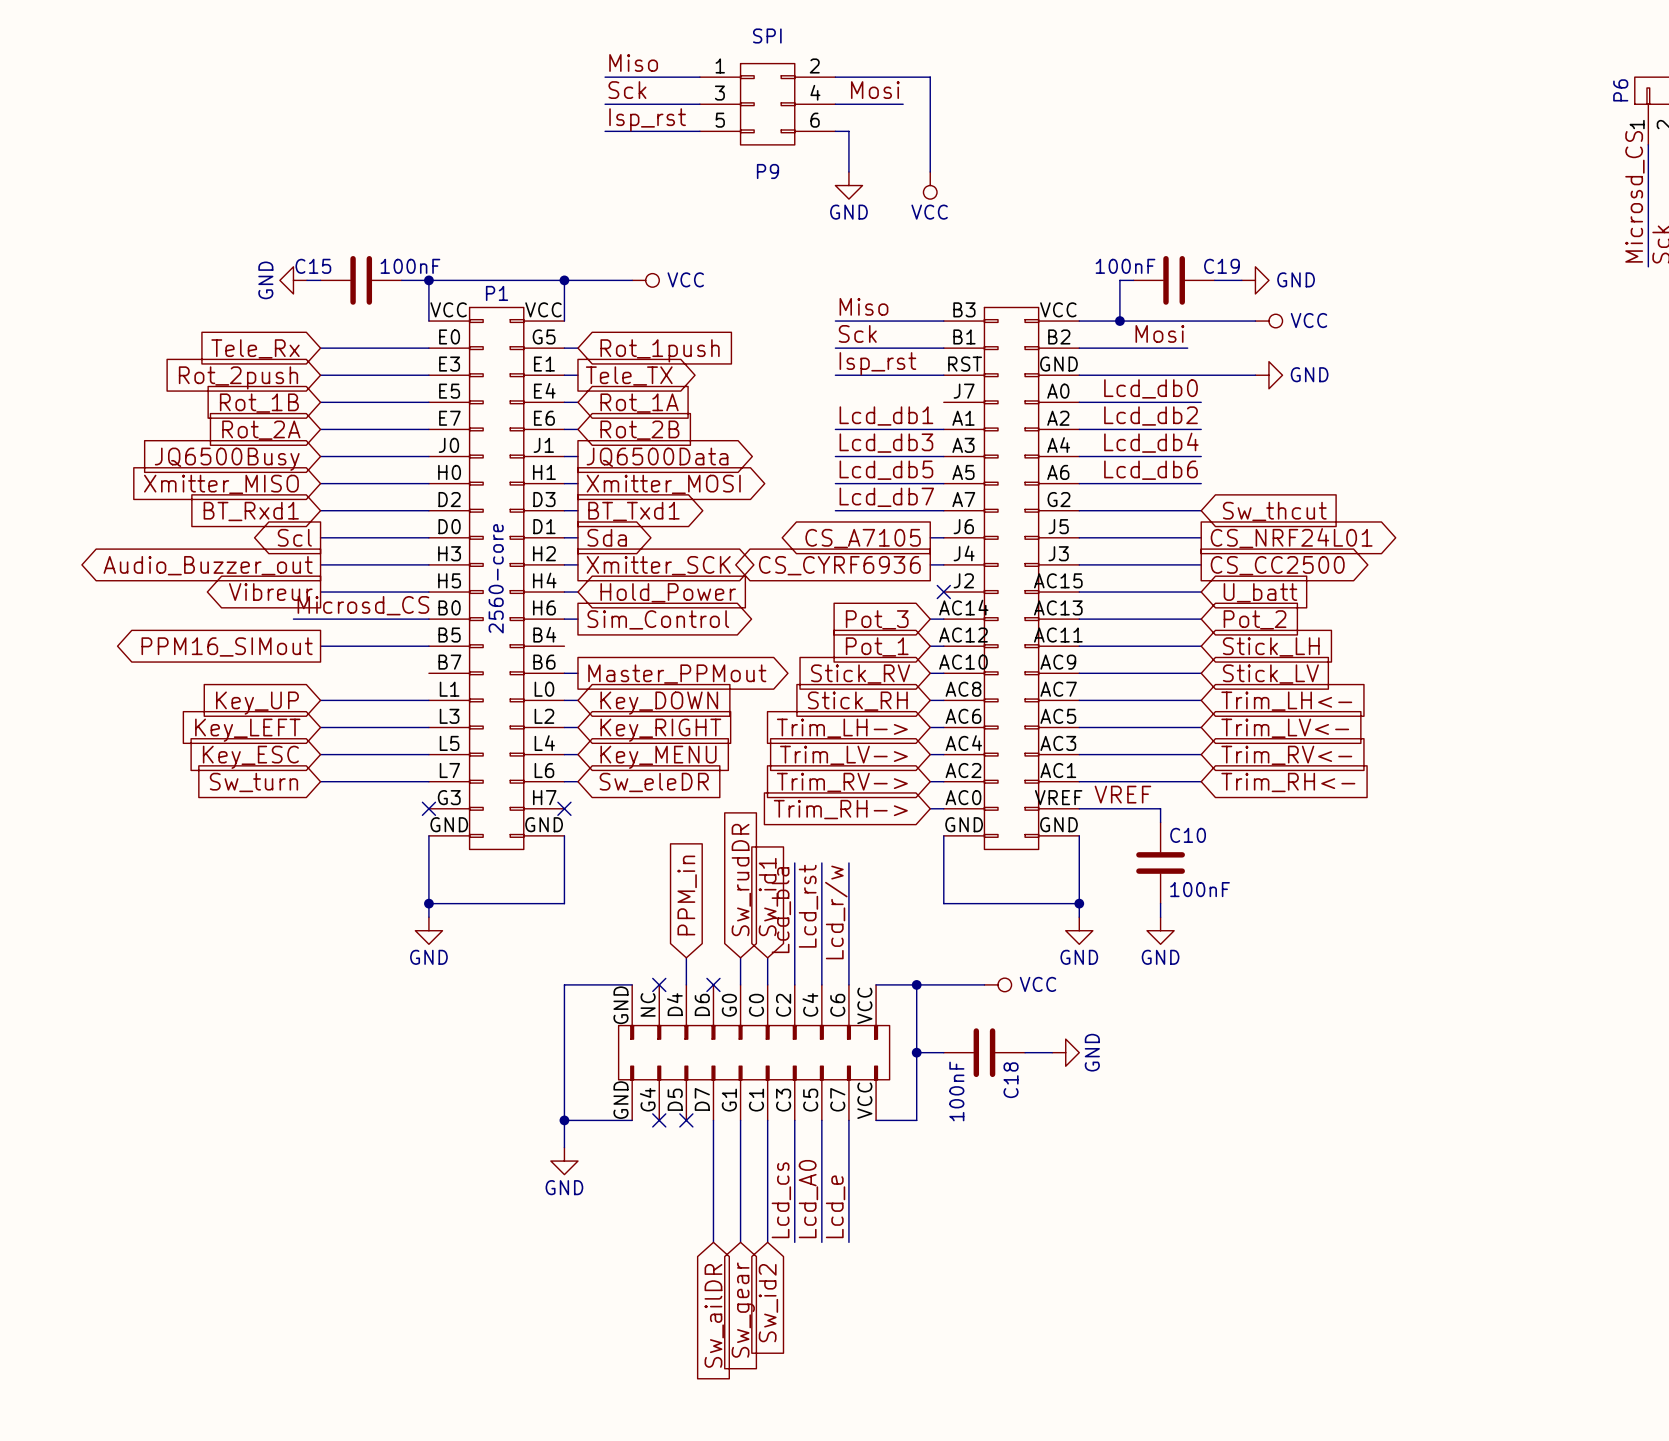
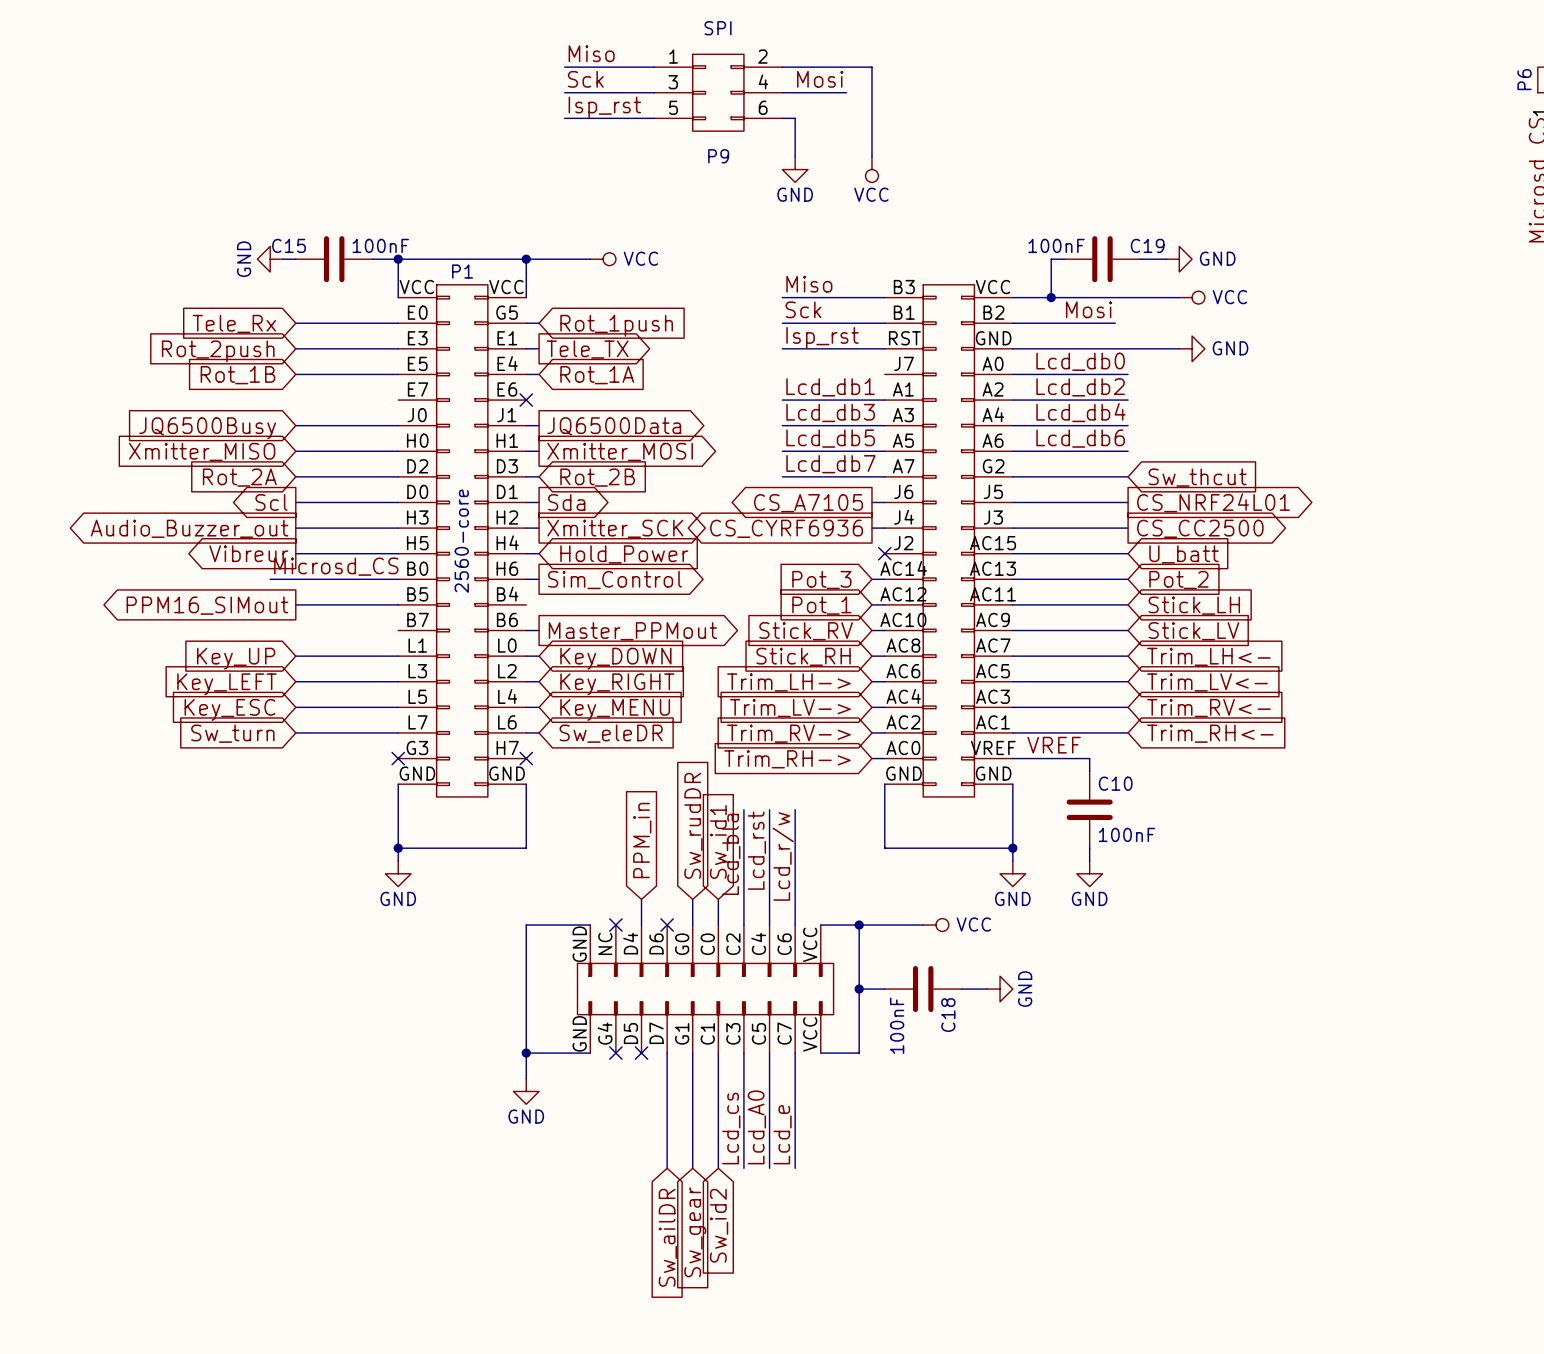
wire: (320, 429) (428, 429) -> none
wire: (564, 429) (577, 429) -> none
no-connect mark: none -> (526, 400)
global label: Rot_2A (261, 430) -> none
global label: Rot_2B (639, 430) -> none
global label: BT_Rxd1 (251, 511) -> Rot_2A (239, 477)
global label shape: output (633, 511) -> input (597, 477)
global label: BT_Txd1 (633, 511) -> Rot_2B (597, 477)

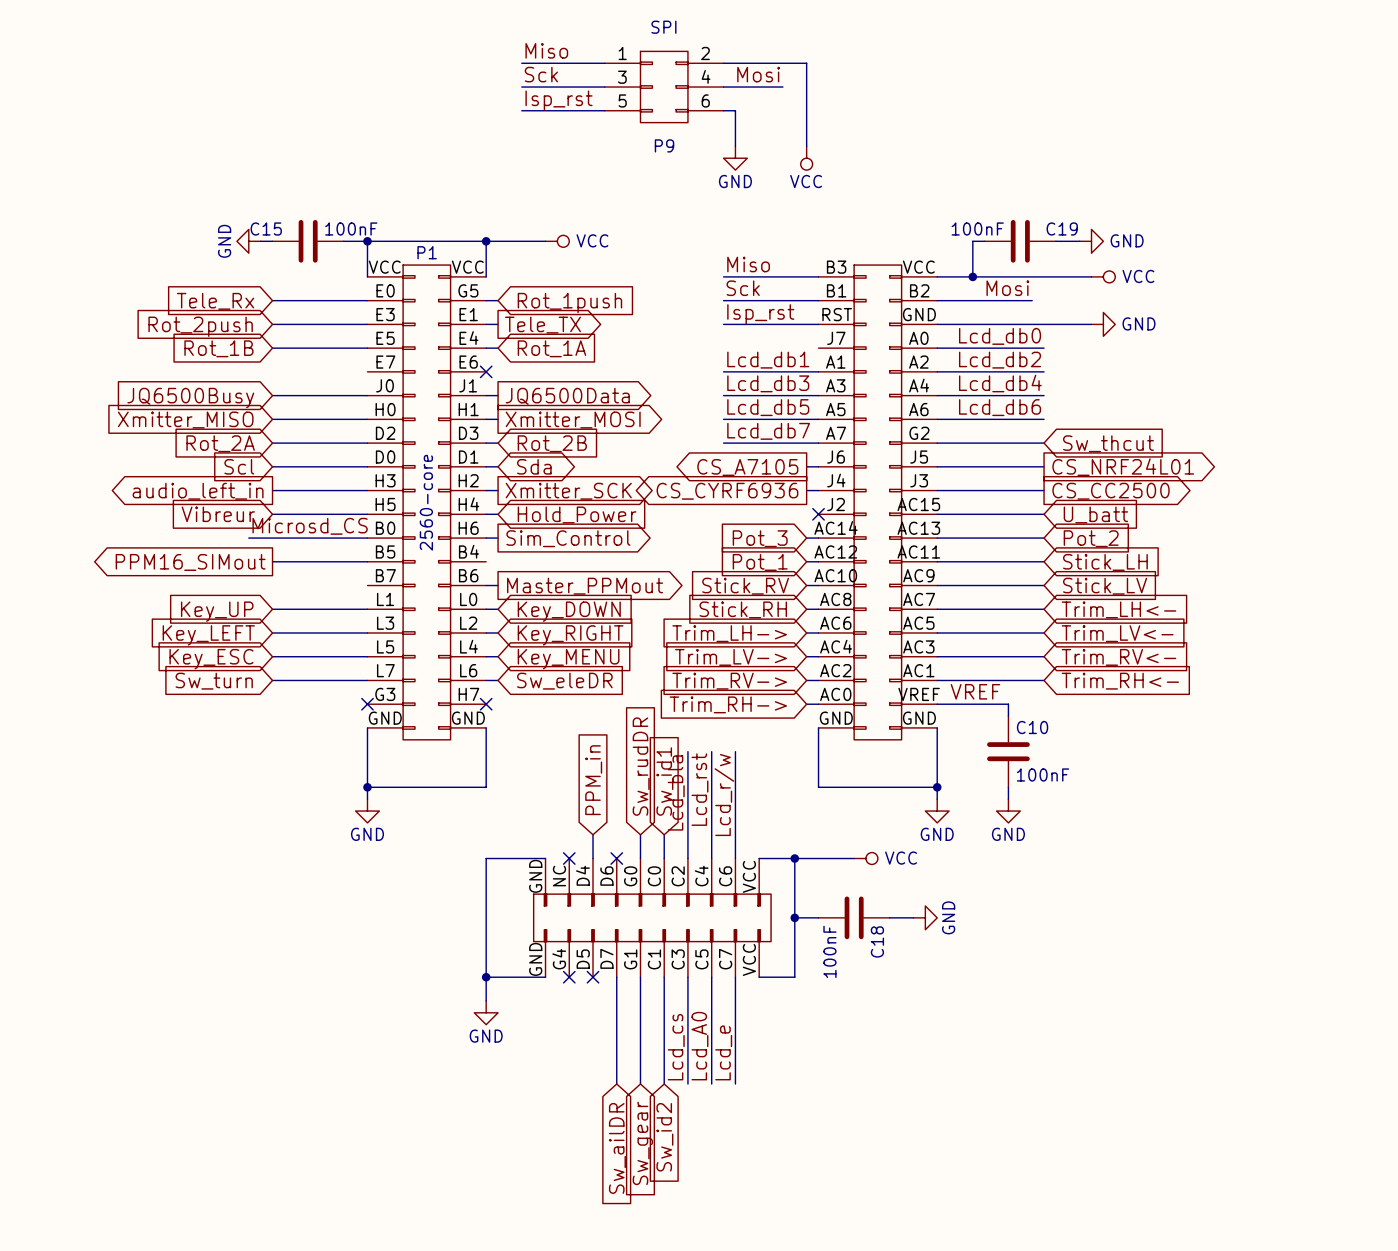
global label shape: output (271, 502) -> input (239, 466)
global label shape: output (566, 502) -> bidirectional (534, 466)
global label: Audio_Buzzer_out (189, 528) -> audio_left_in (198, 491)
global label shape: output (248, 553) -> input (218, 514)

